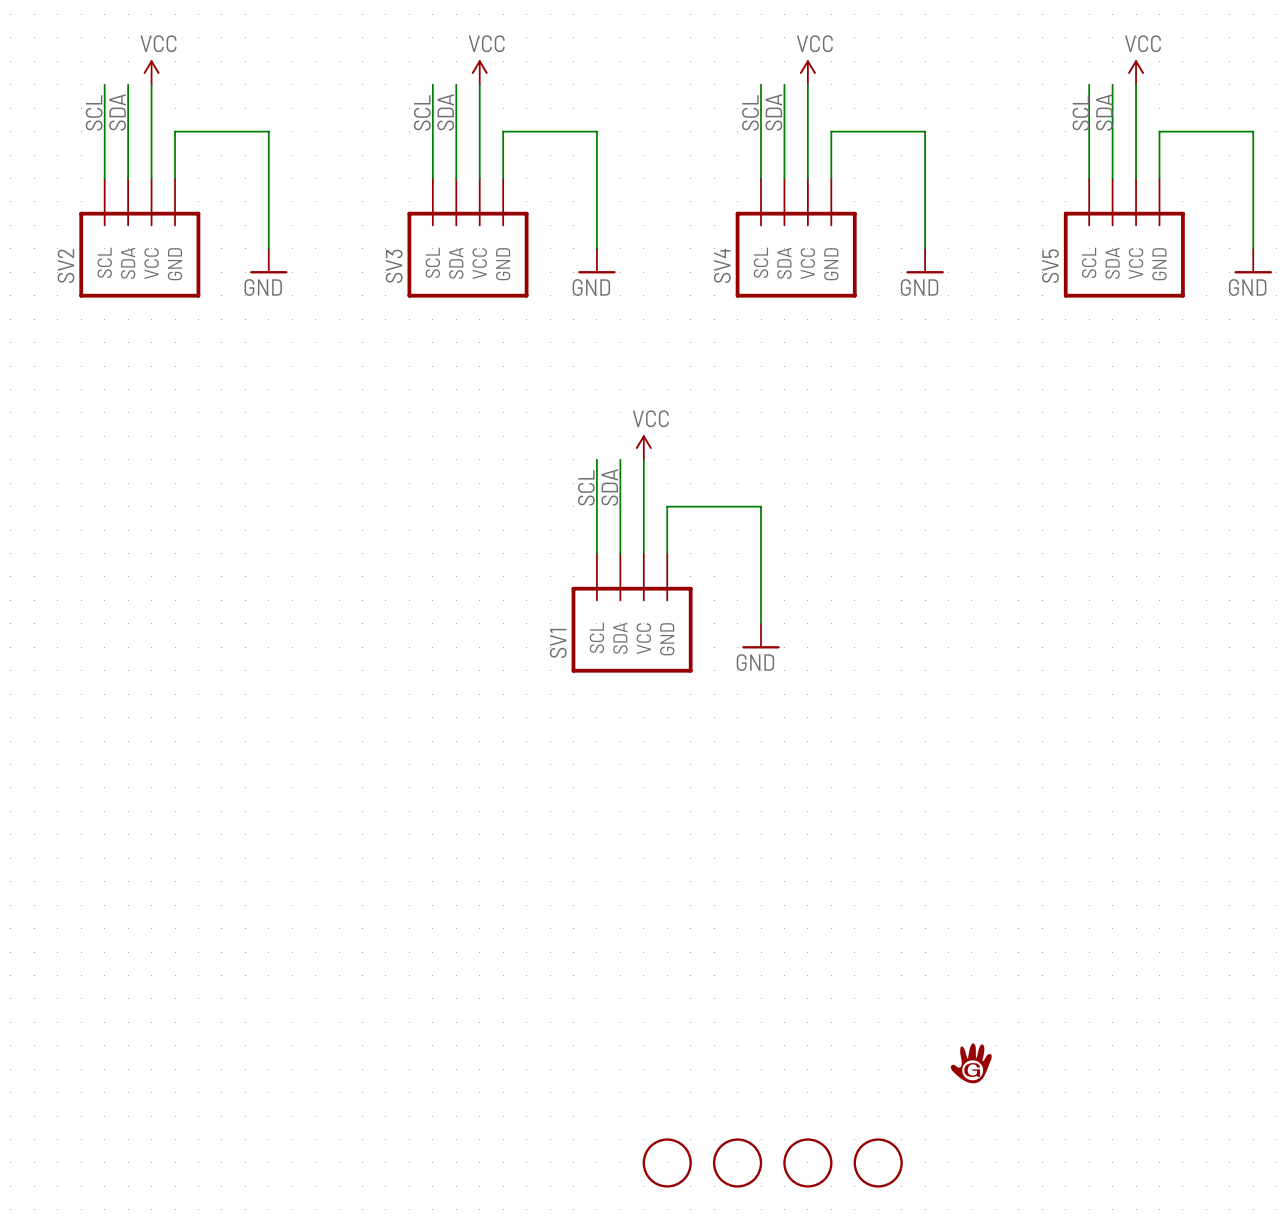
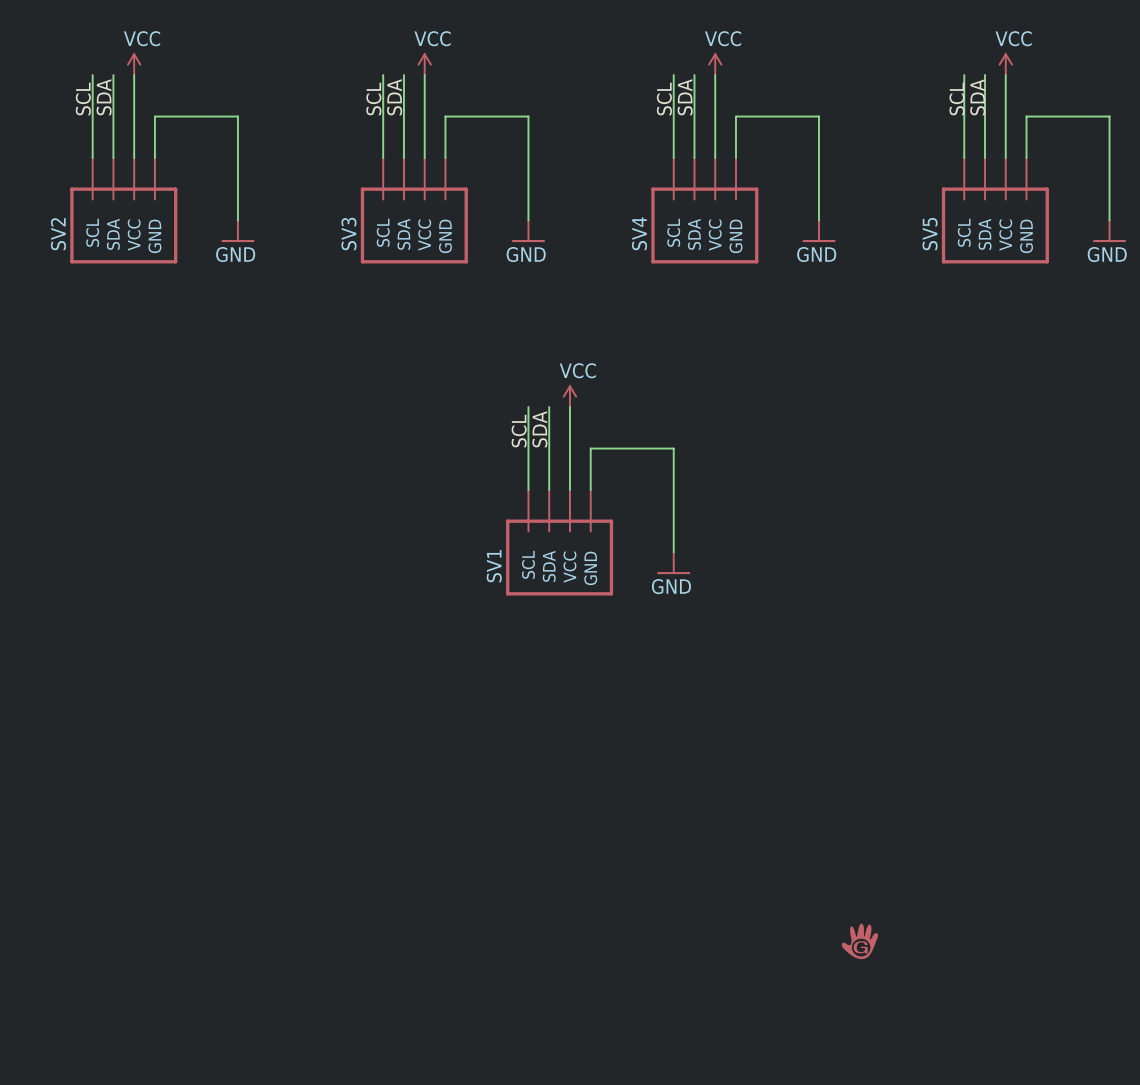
part: (667, 1162) -> none
part: (737, 1162) -> none
part: (807, 1162) -> none
part: (878, 1162) -> none

